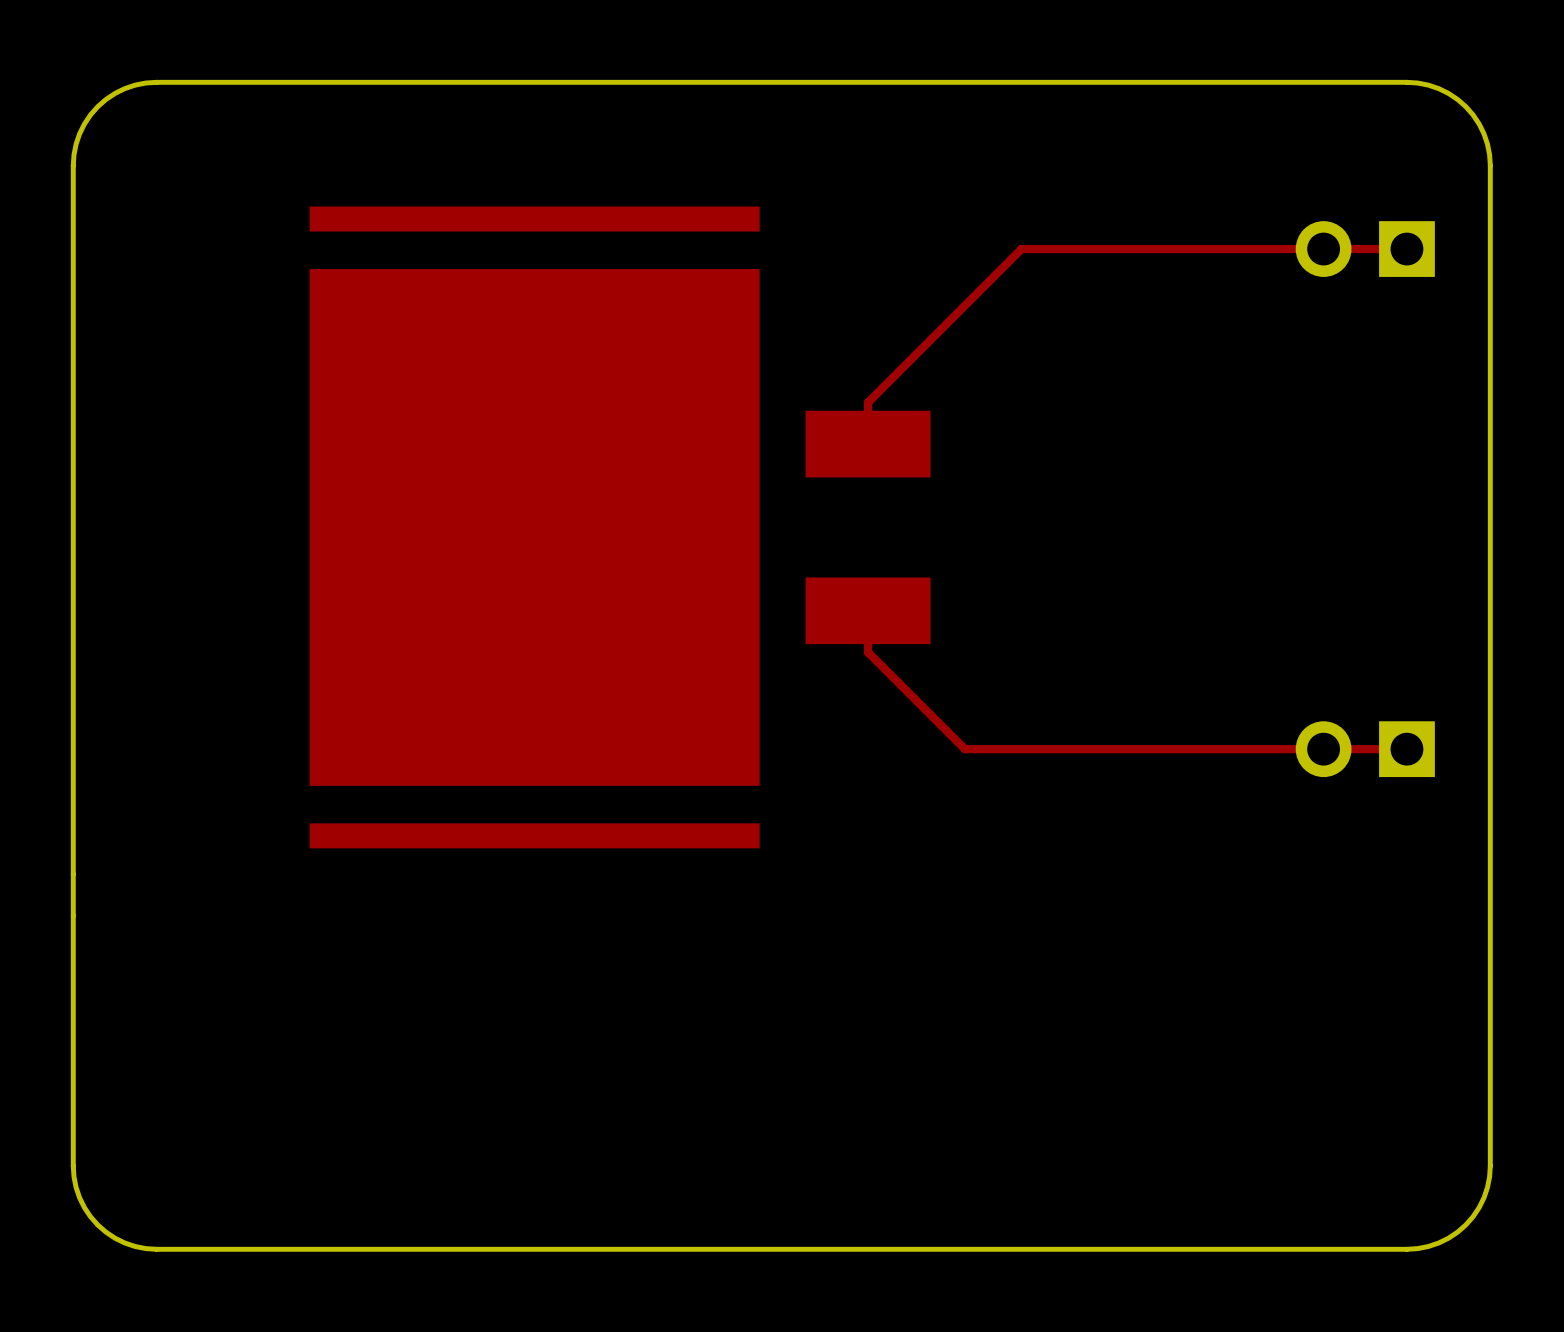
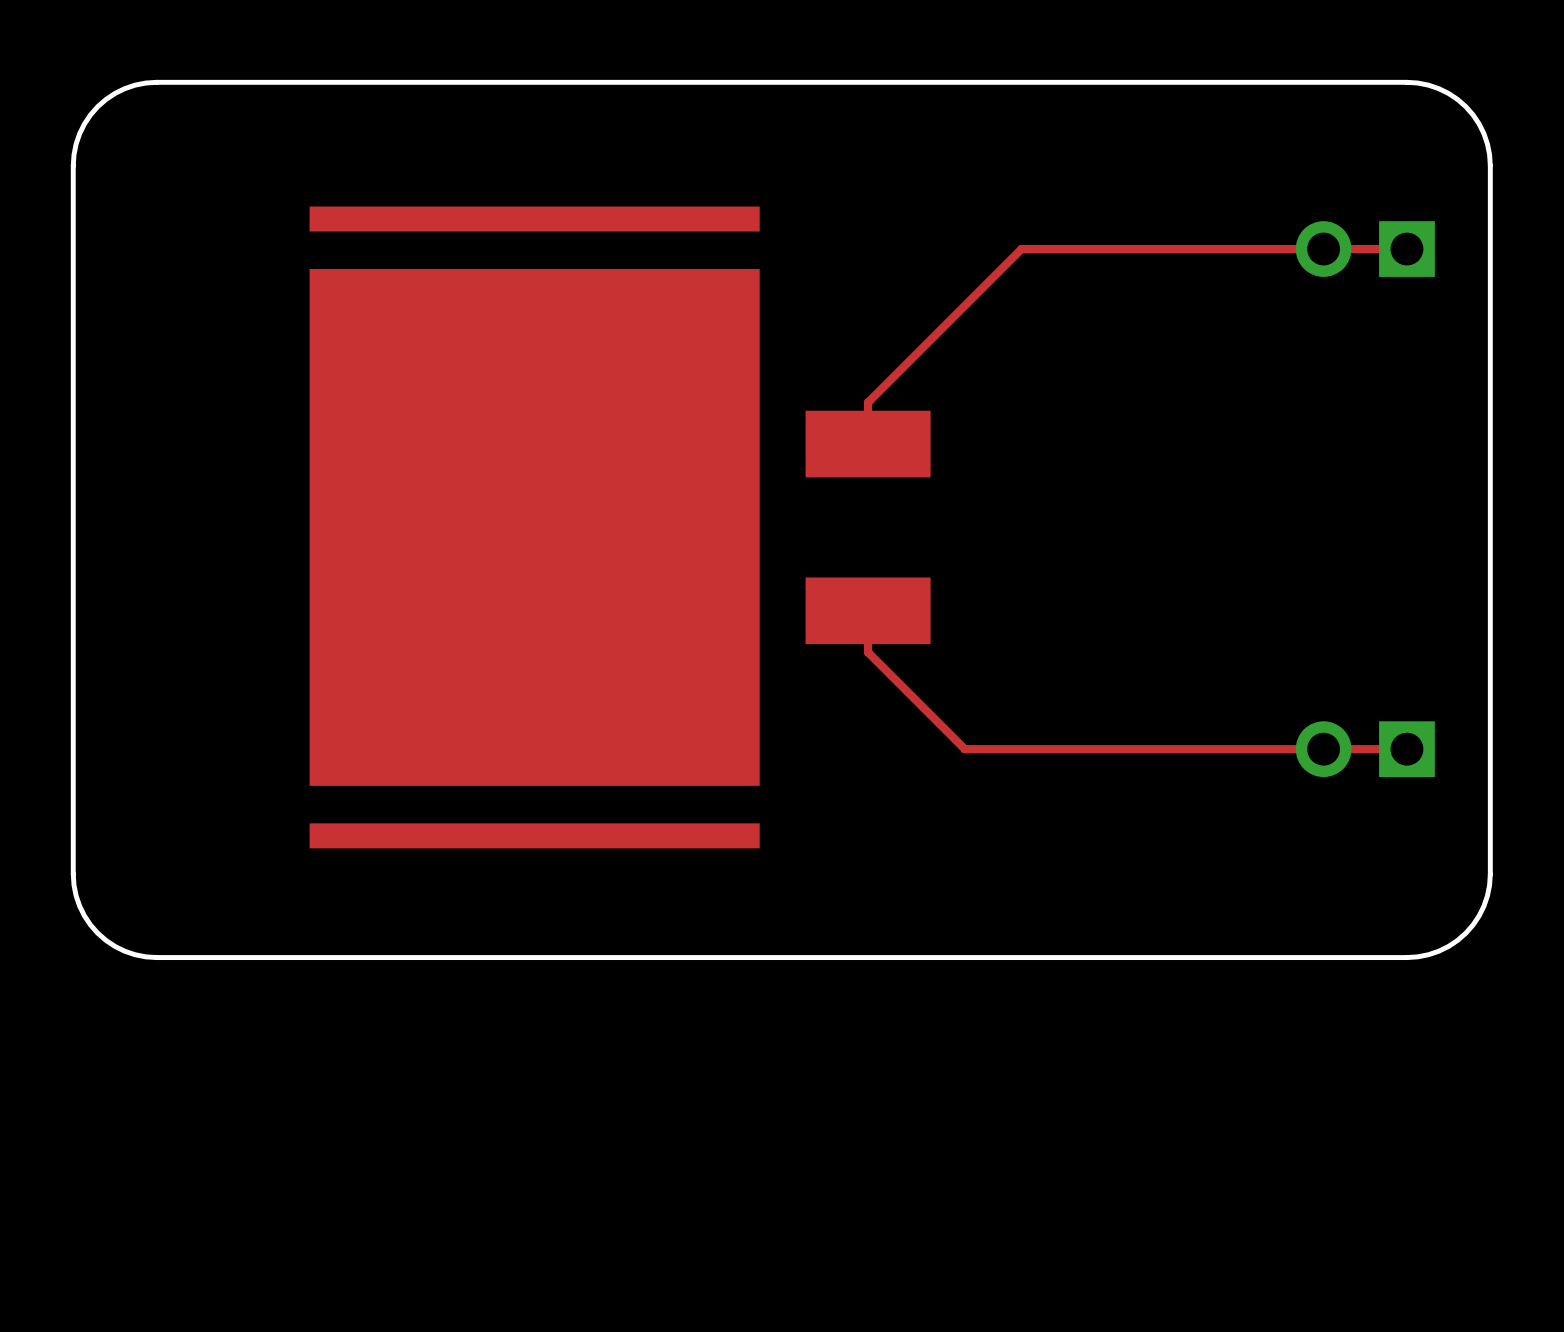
board edge: (1490, 874) (1490, 1165) (1487, 1187) (1473, 1216) (1457, 1232) (1428, 1246) (1406, 1249) (156, 1249) (135, 1246) (114, 1238) (90, 1216) (79, 1197) (73, 1176) (73, 874) -> (1490, 874) (1483, 906) (1465, 933) (1438, 951) (1406, 957) (156, 957) (124, 951) (97, 933) (79, 906) (73, 874)

